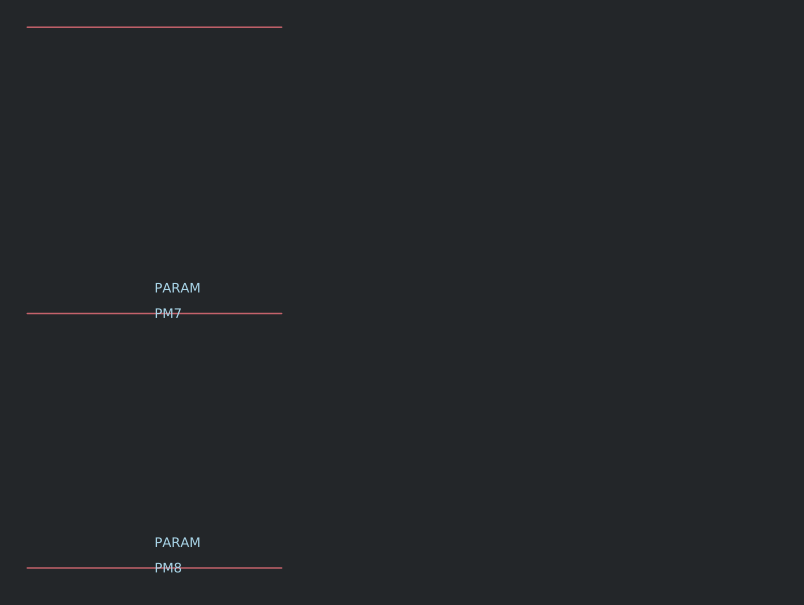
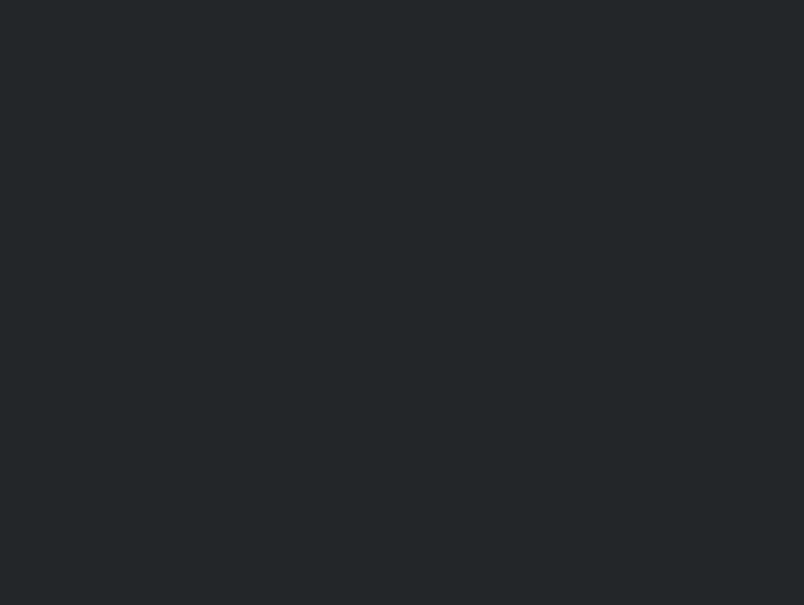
part: (154, 27) -> none
PM7: PARAM (154, 313) -> none
PM8: PARAM (154, 567) -> none

